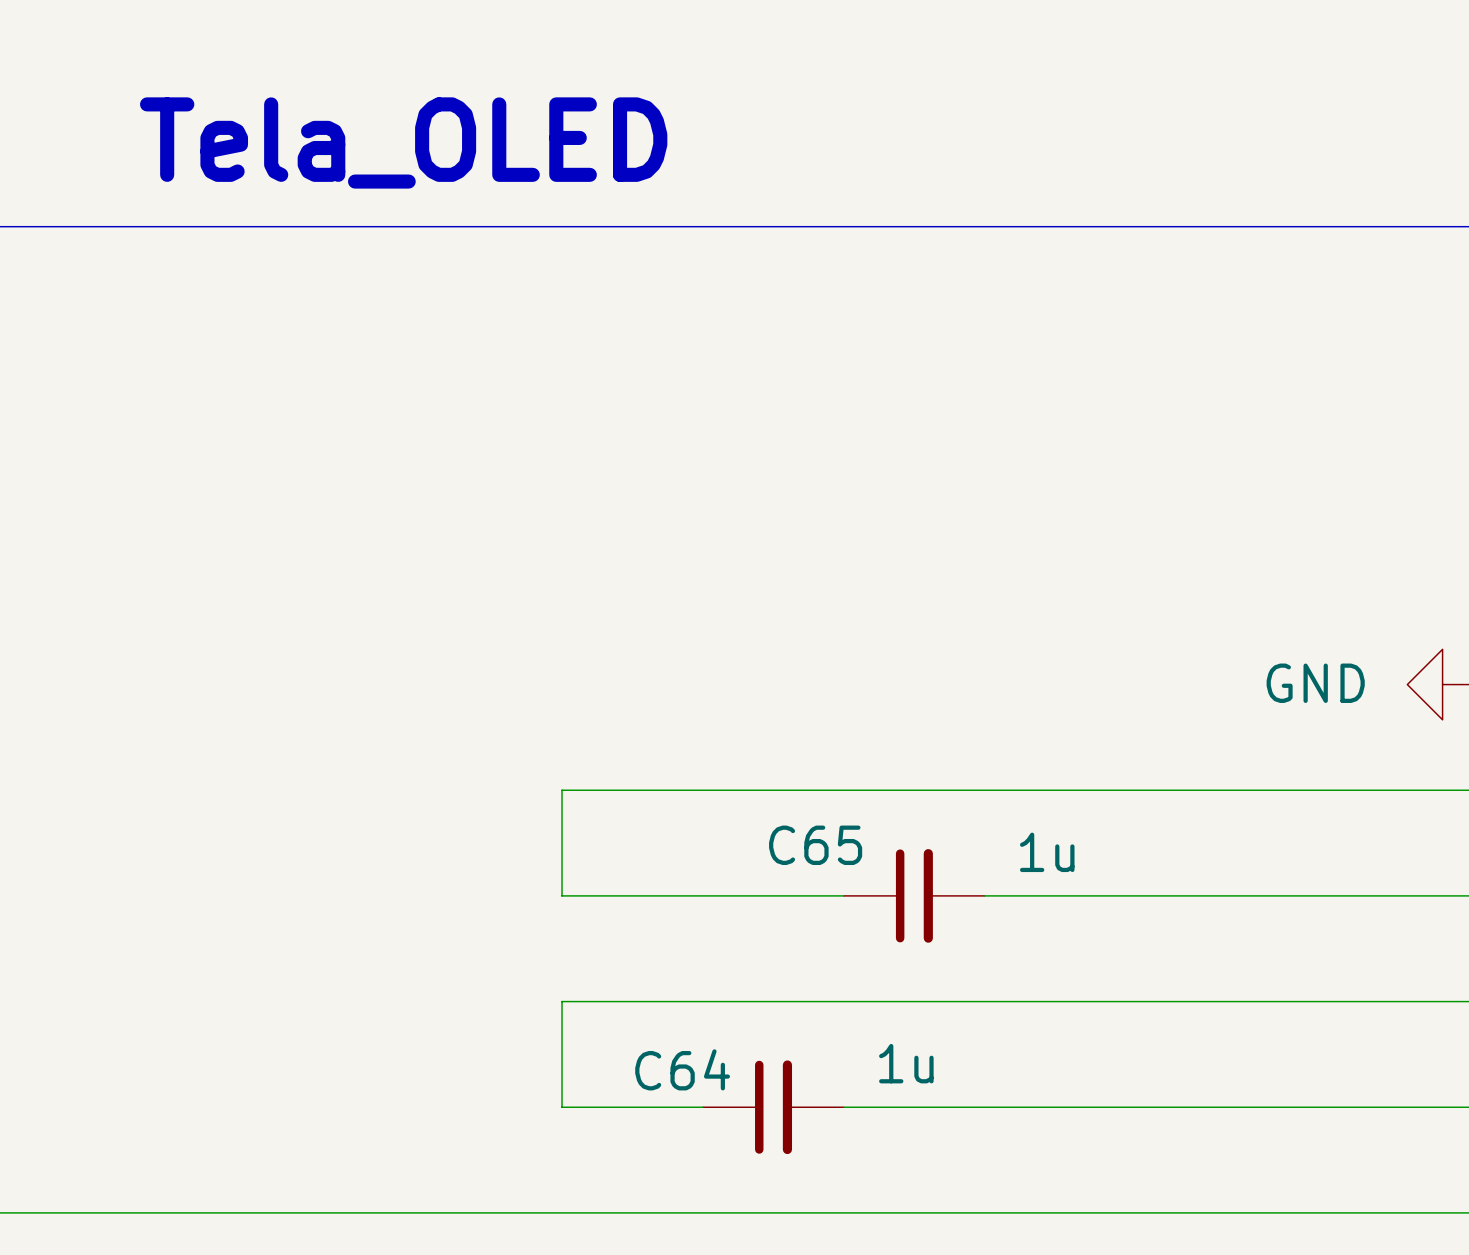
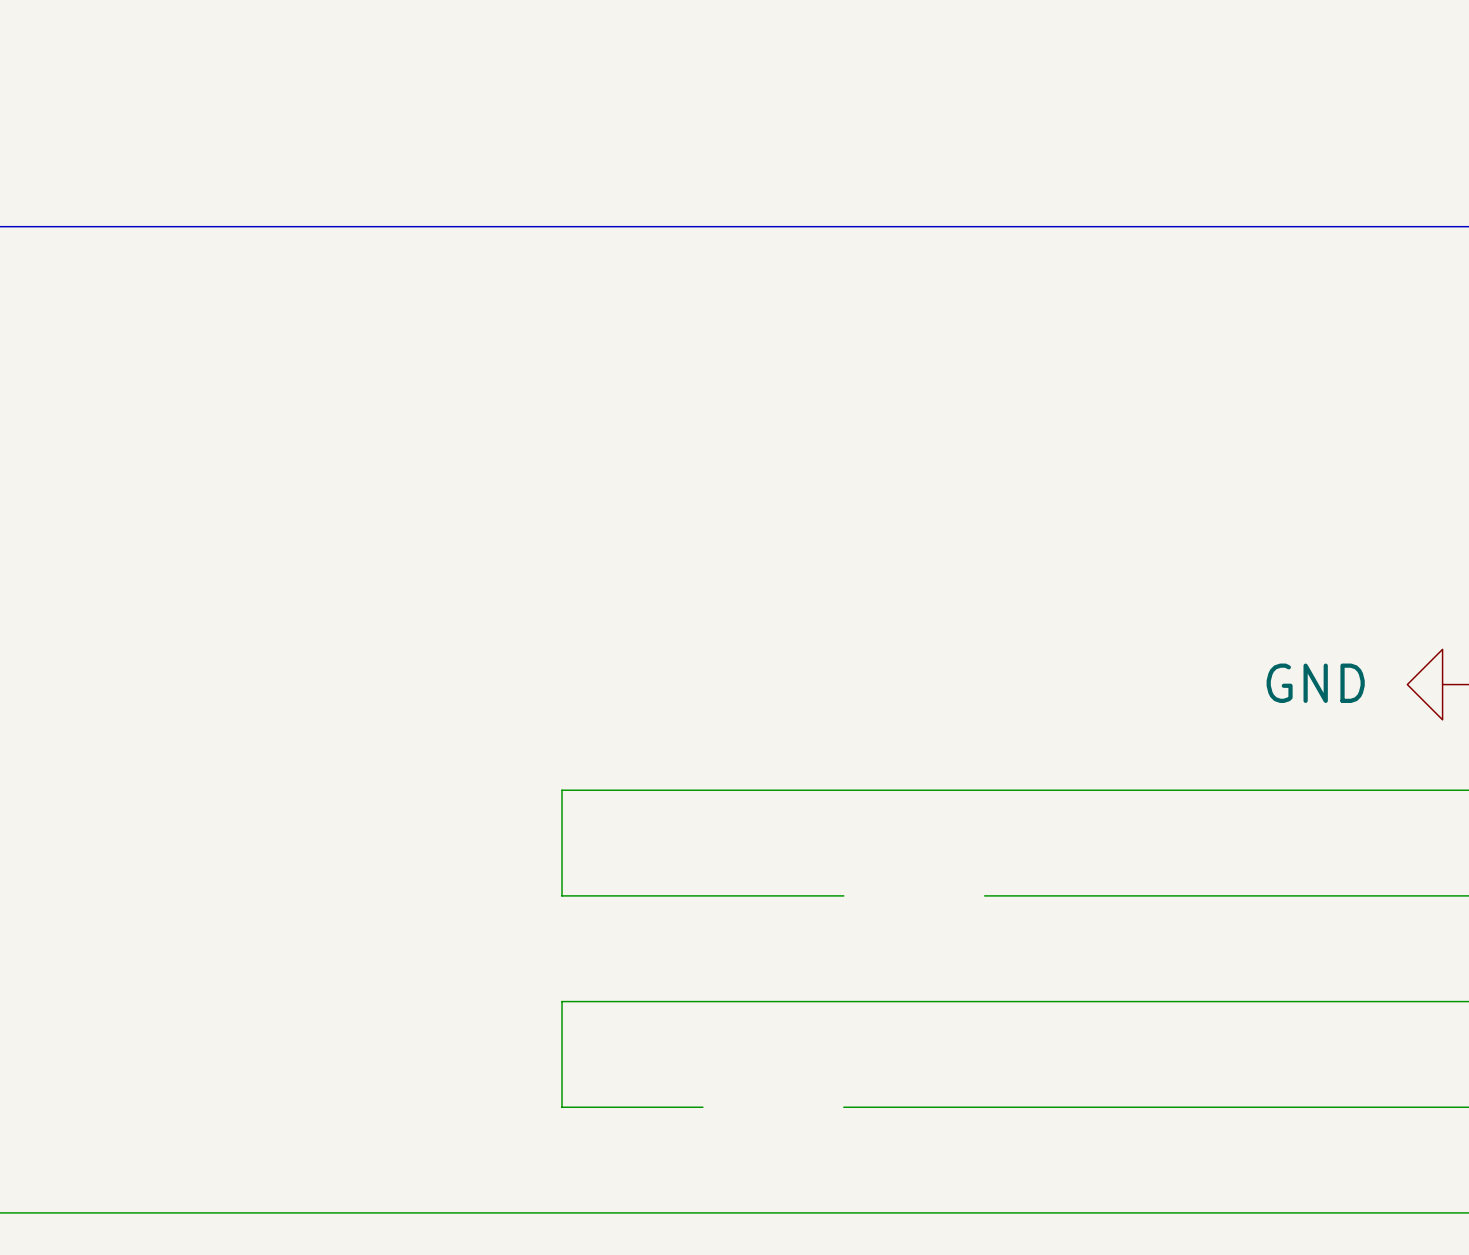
text: Tela_OLED (403, 142) -> none
C65: 1u (914, 895) -> none
C64: 1u (773, 1107) -> none

